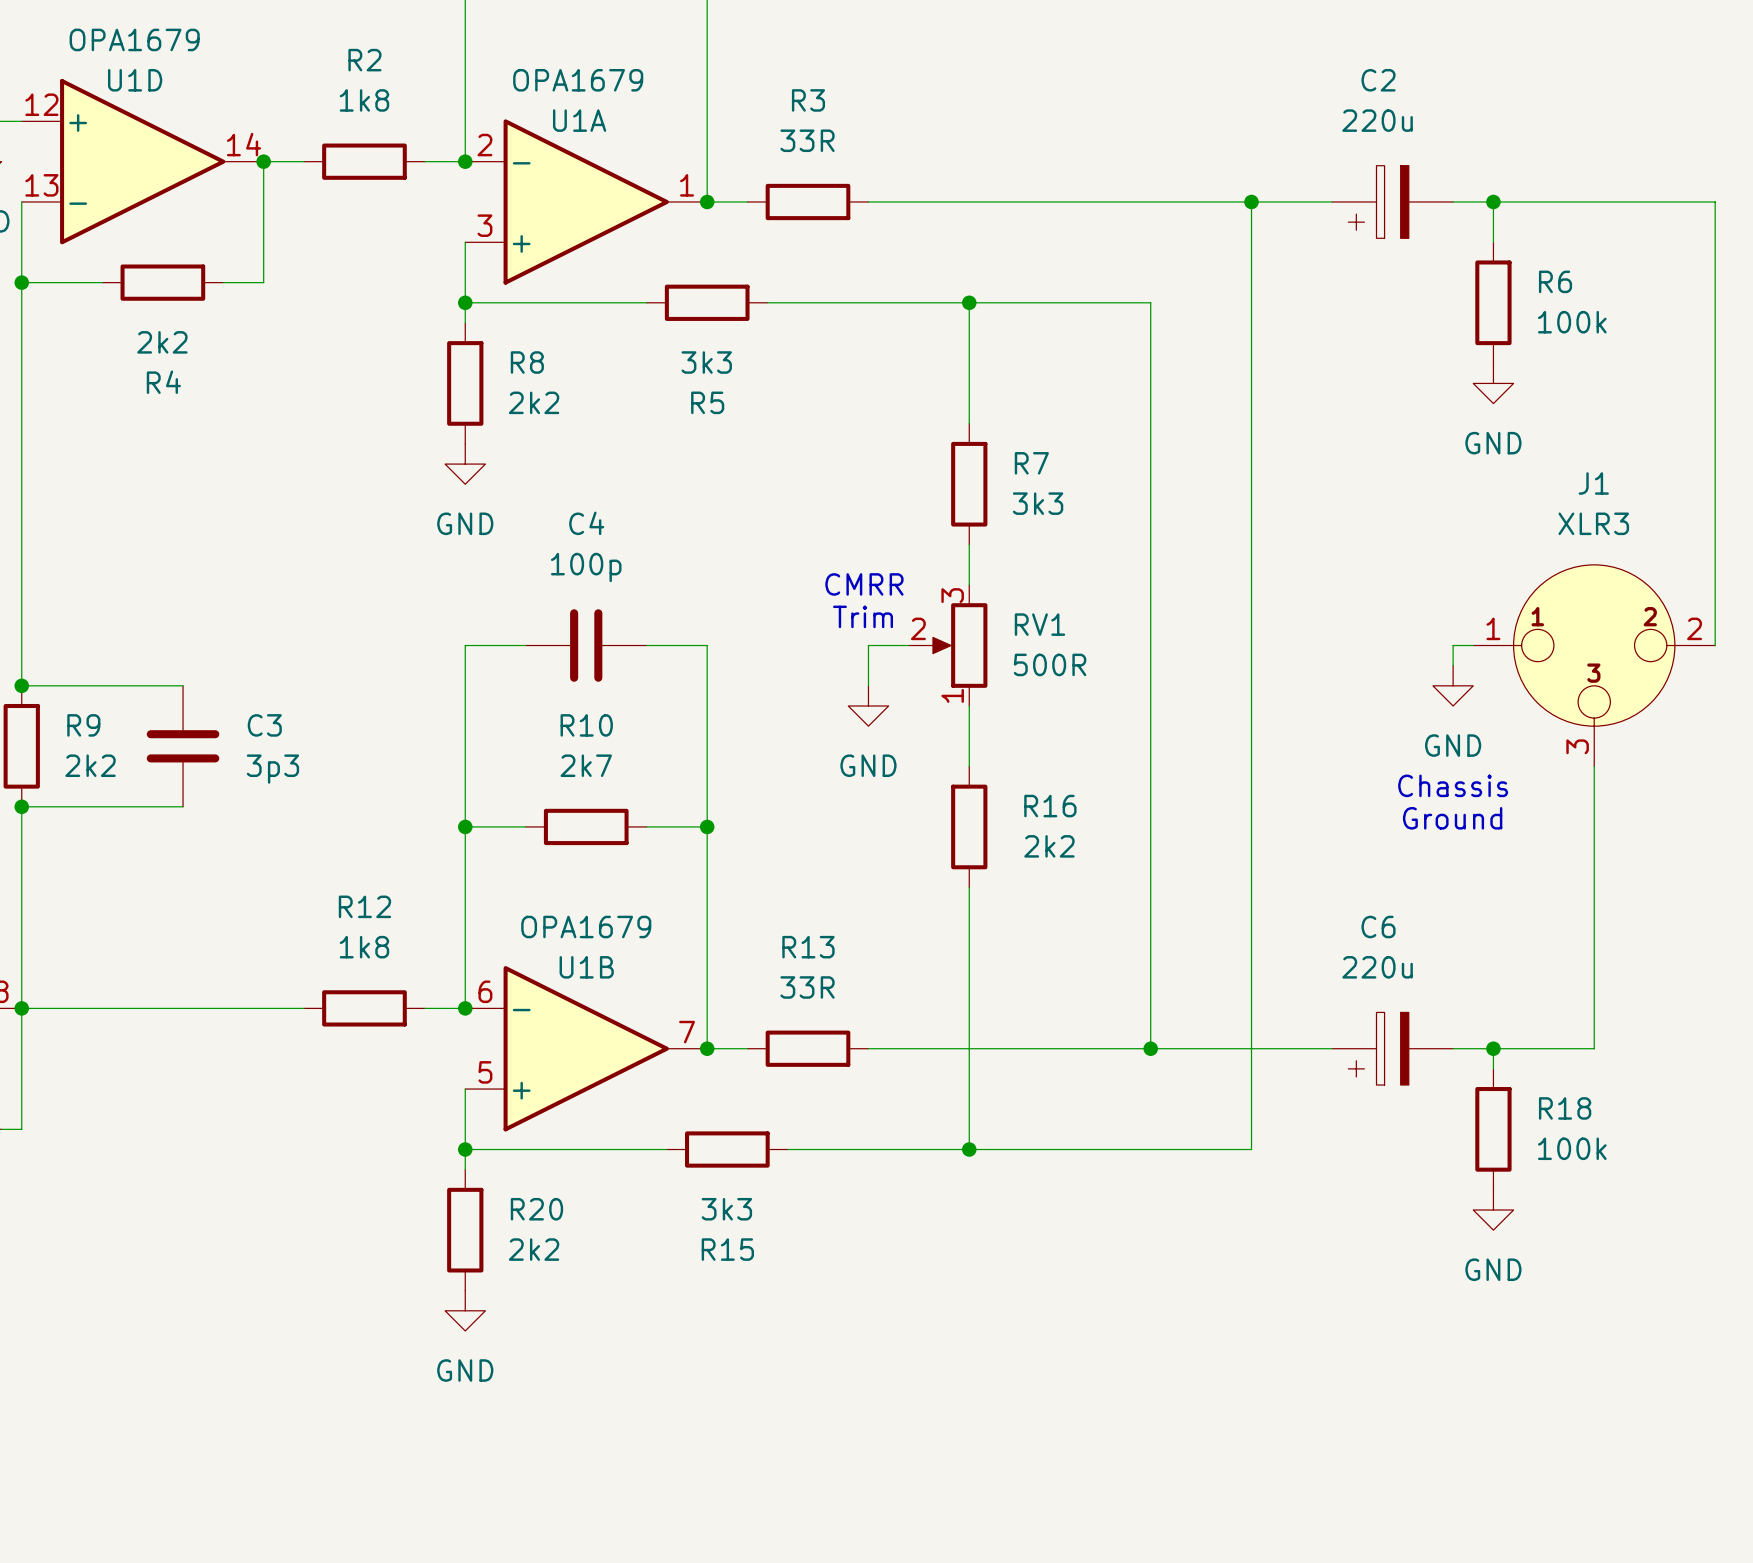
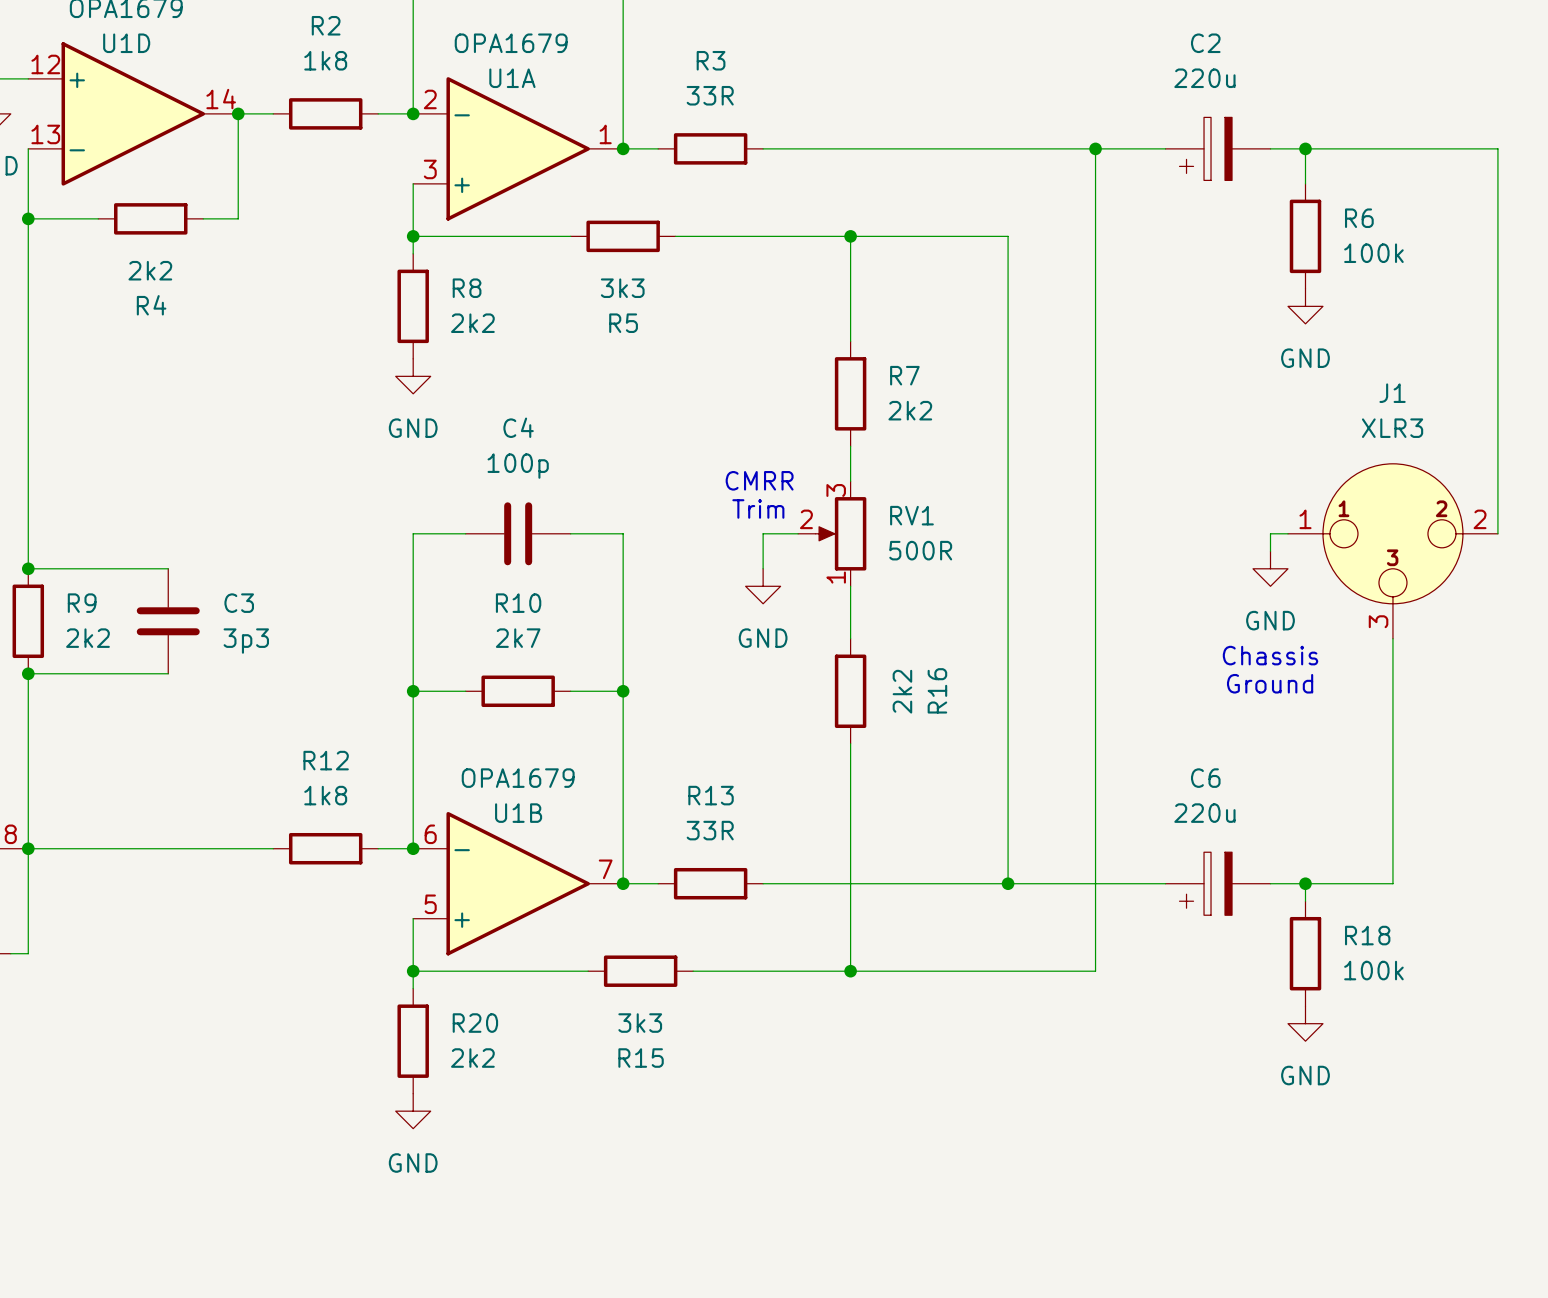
R7 value: 3k3 (1038, 503) -> 2k2 (910, 410)
R16 name rotation: 0° (1050, 806) -> 90° counterclockwise (937, 690)
R16 value rotation: 0° (1049, 846) -> 90° counterclockwise (902, 691)

